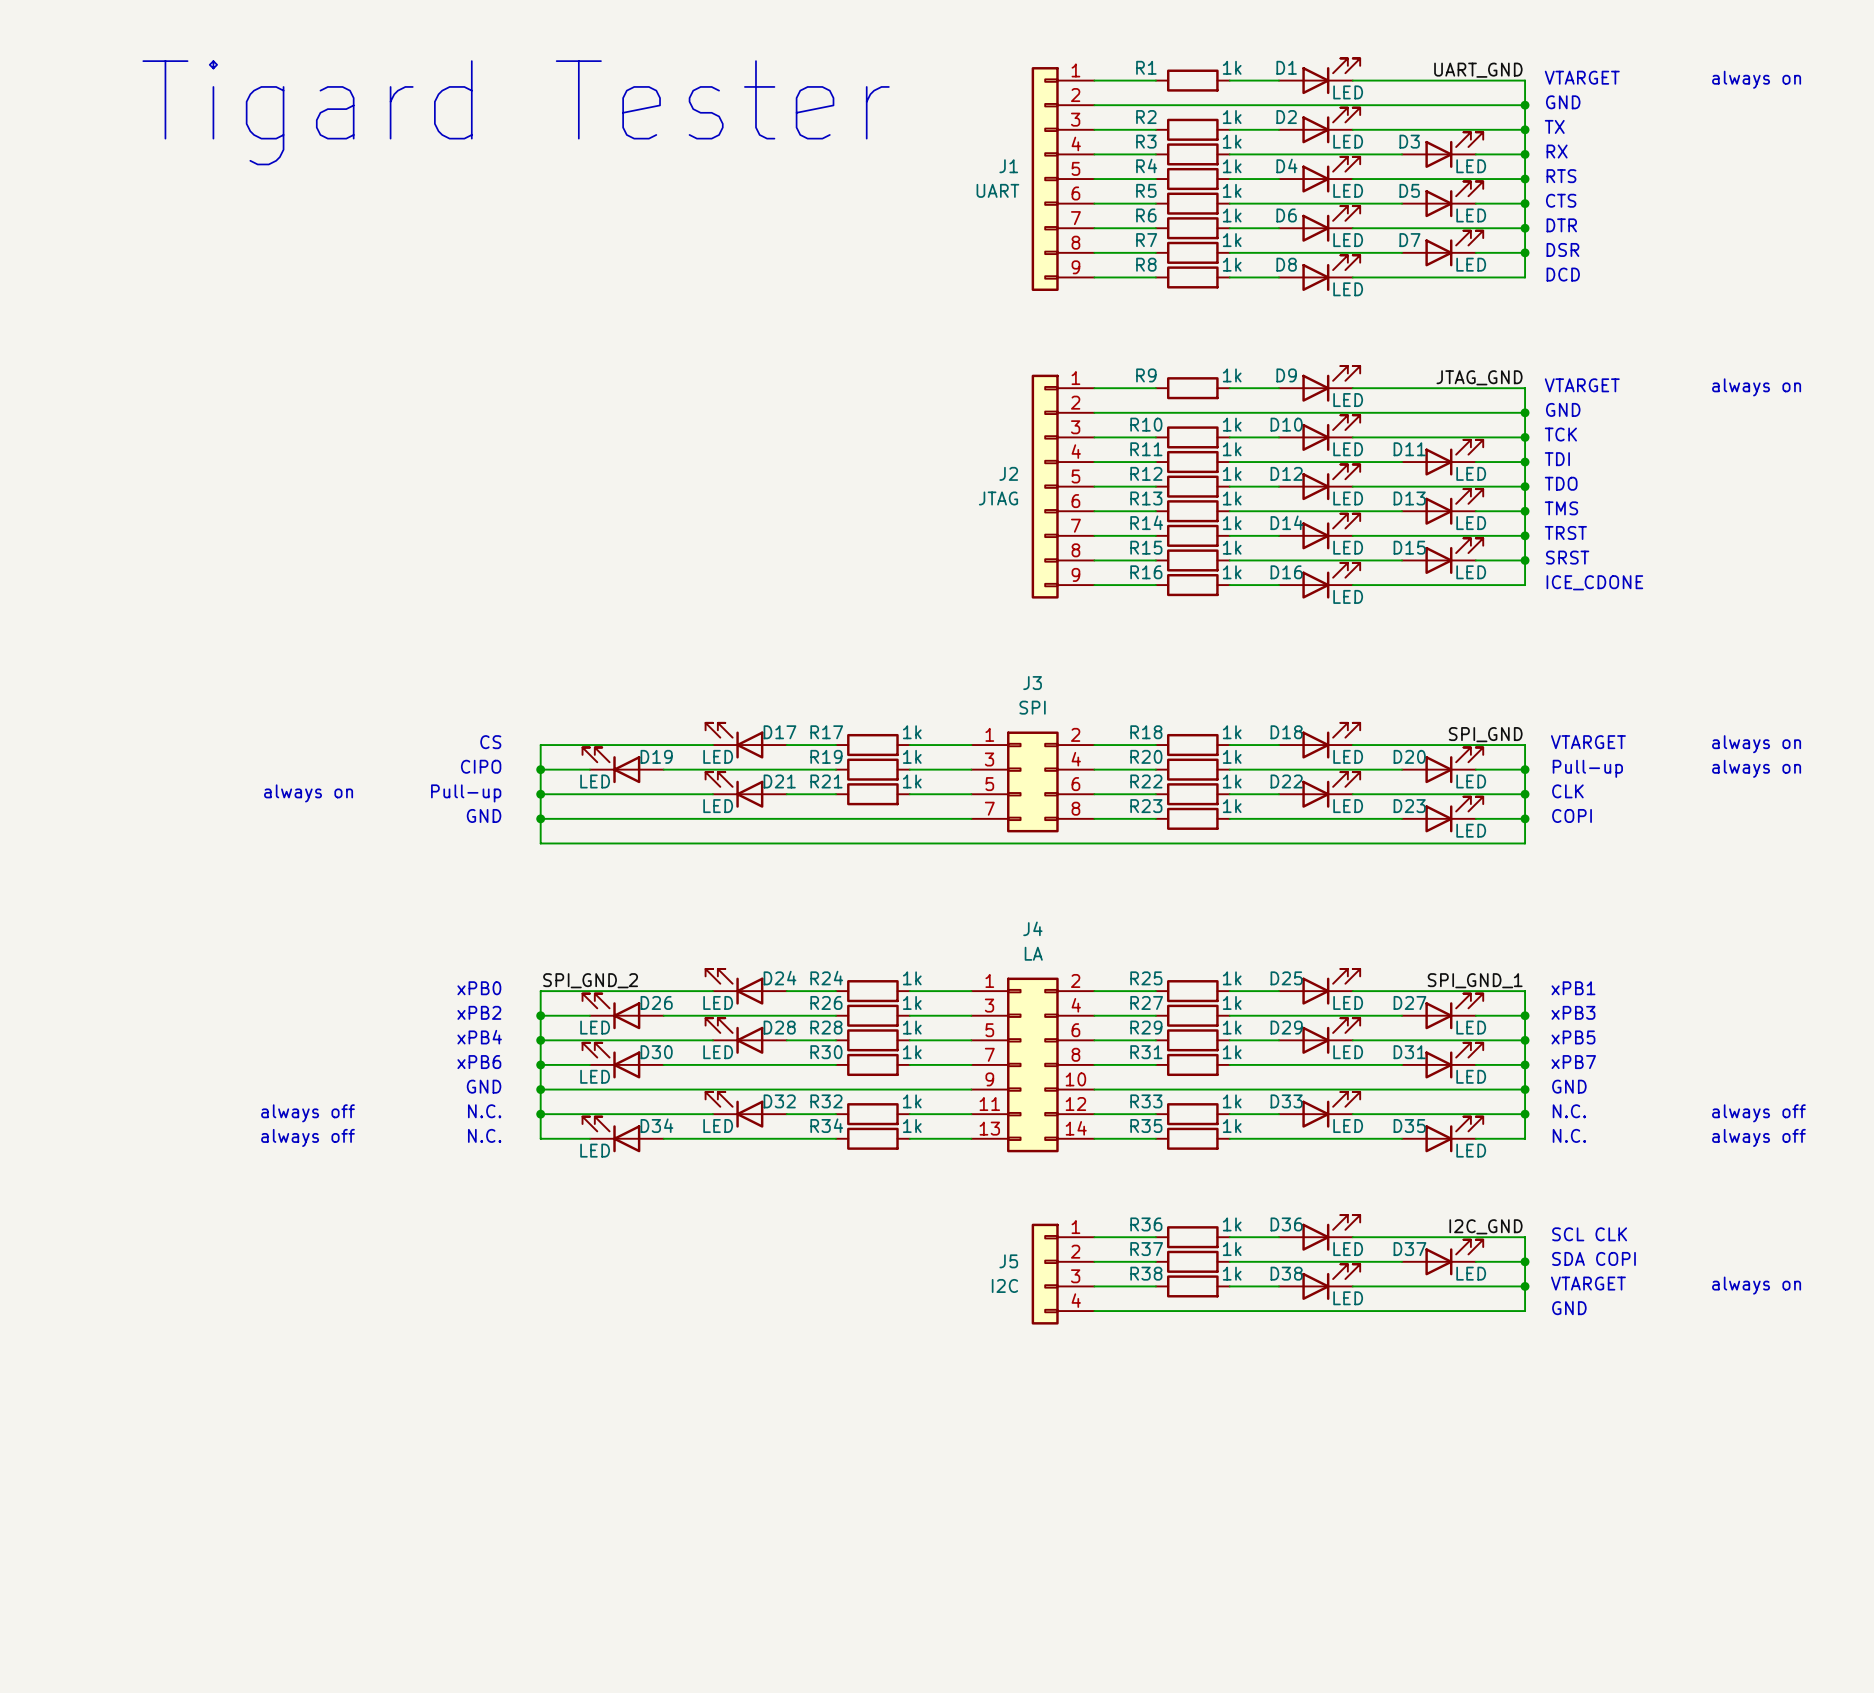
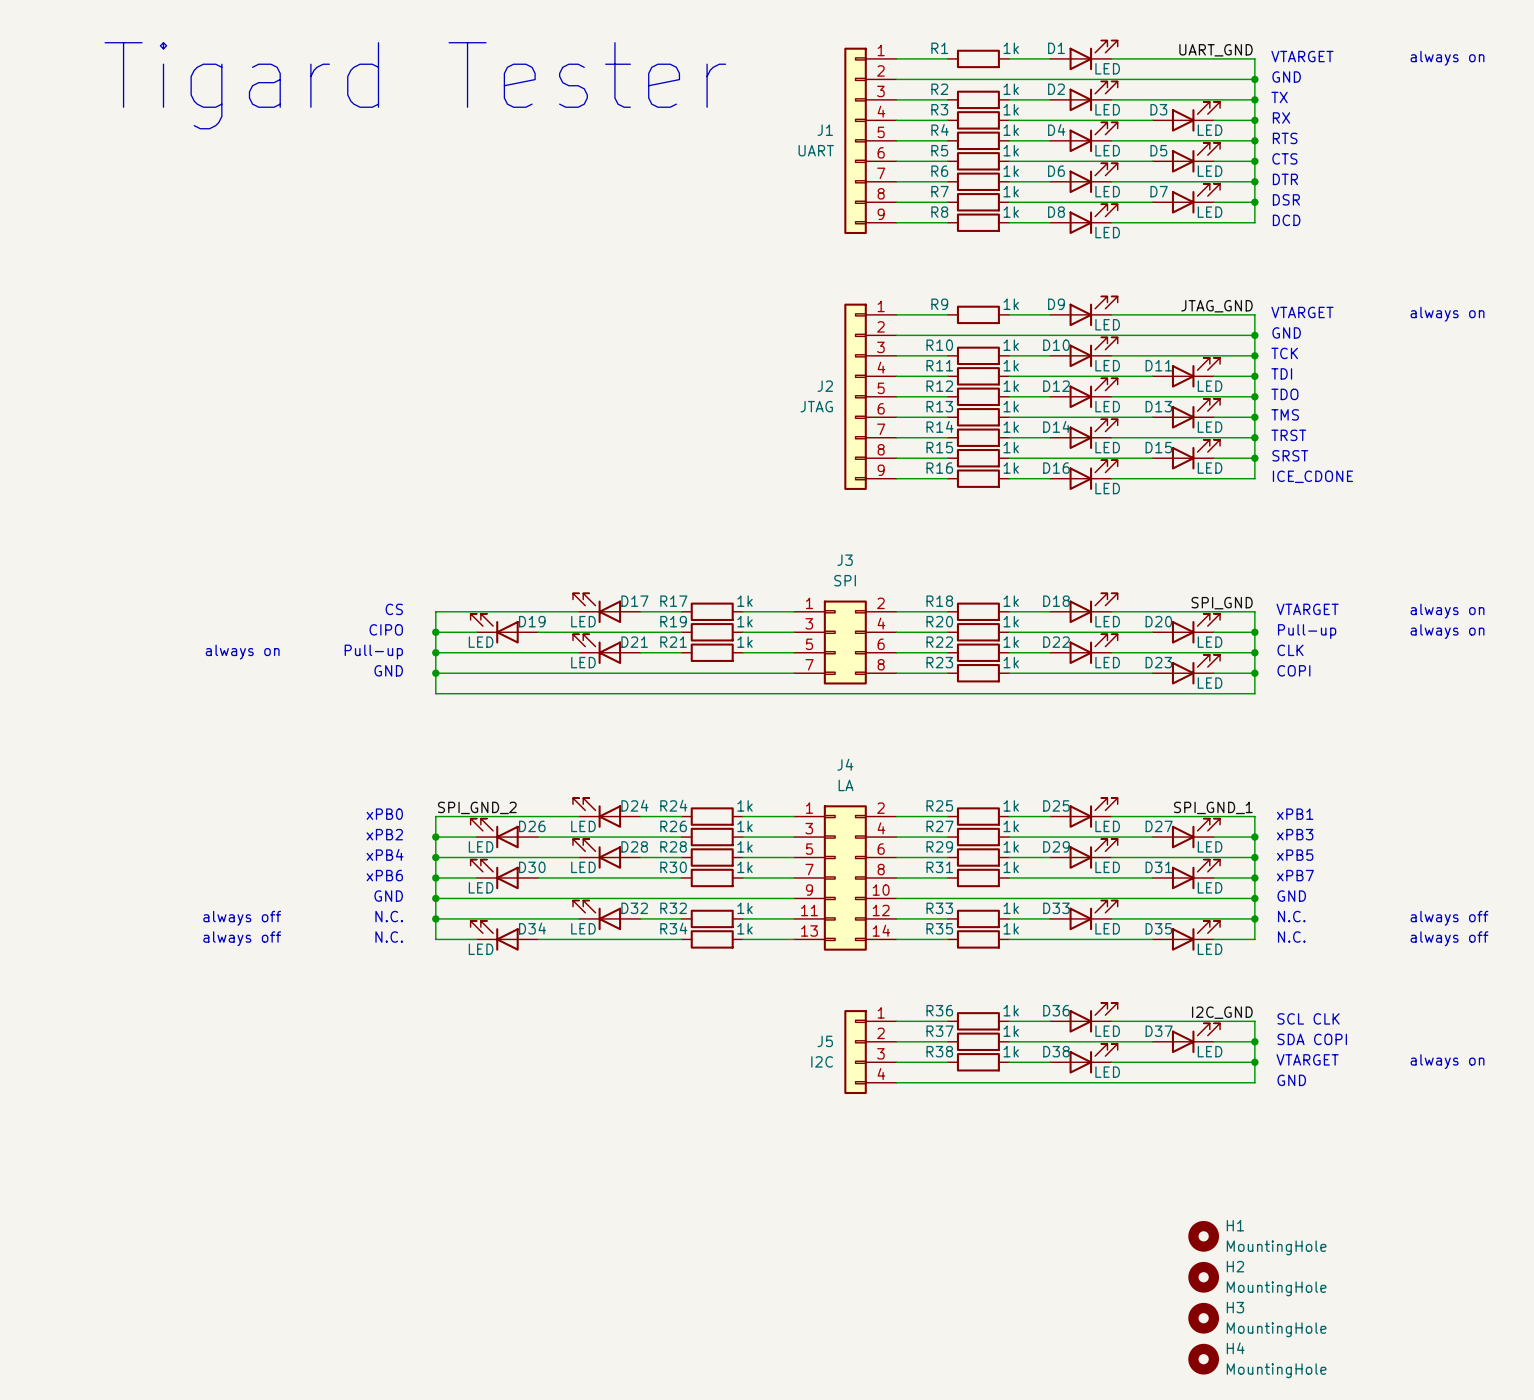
H1: none -> MountingHole (1203, 1236)
H2: none -> MountingHole (1203, 1277)
H3: none -> MountingHole (1203, 1318)
H4: none -> MountingHole (1203, 1359)

